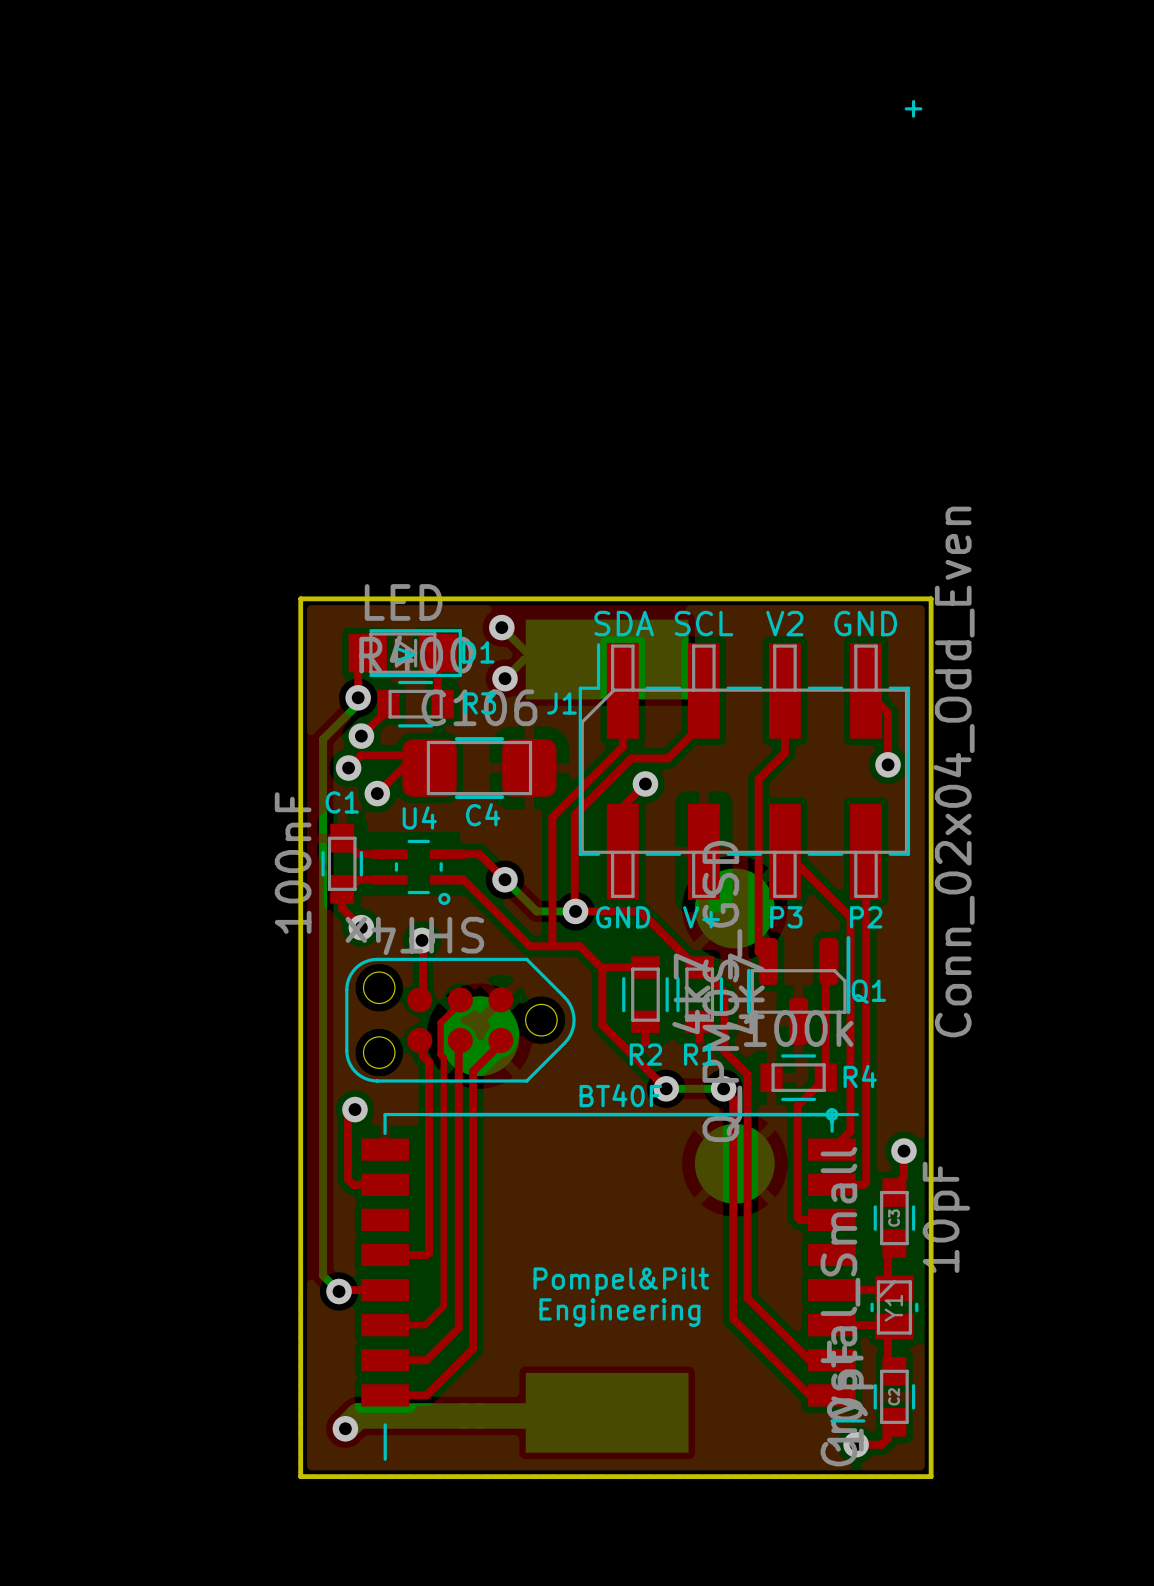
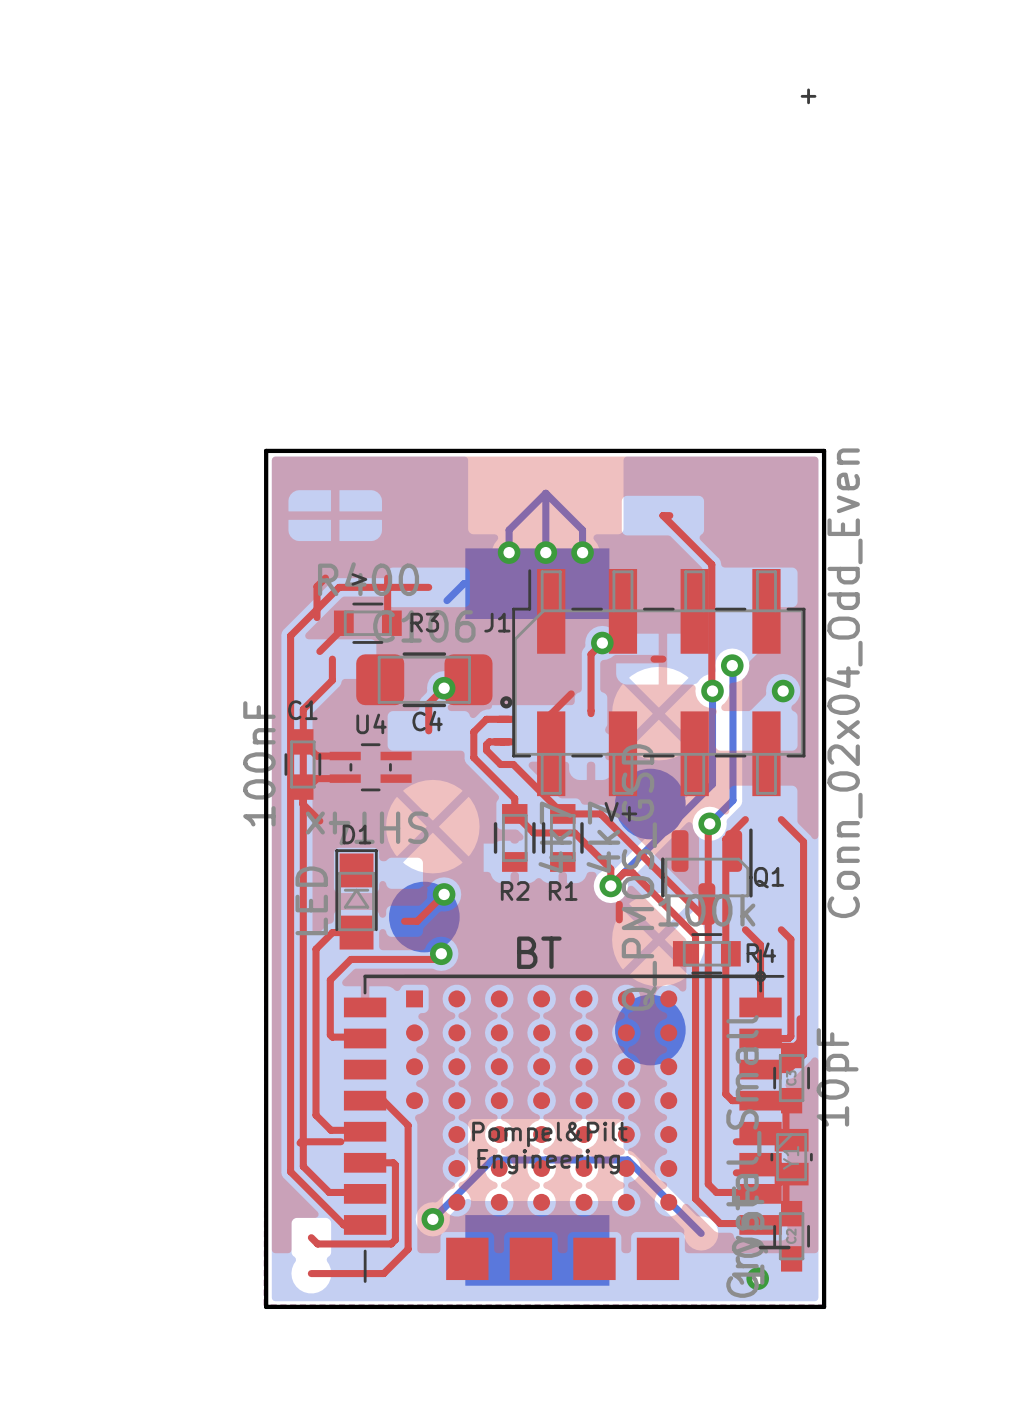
bottom track: none -> (545, 493) (509, 530) (509, 552)
bottom track: none -> (545, 493) (545, 552)
bottom track: none -> (545, 493) (582, 530) (582, 552)
top track: none -> (669, 515) (662, 515) (711, 564) (712, 691)
board edge: (300, 598) (931, 598) -> (266, 530) (266, 450) (824, 450) (824, 530)
text: SDA (624, 623) -> none
text: SCL (703, 623) -> none
text: V2 (784, 623) -> none
text: GND (865, 623) -> none
via: none -> (509, 552)
via: none -> (545, 552)
via: none -> (582, 552)
bottom track: (501, 627) (533, 659) -> none
via: (501, 627) -> none
D1 rotation: 0° (405, 653) -> 90° counterclockwise (356, 899)
D1 position: (405, 653) -> (356, 899)
top track: none -> (428, 587) (339, 587) (290, 635) (290, 1171) (343, 1224) (362, 1224) (360, 1223)
via: (505, 678) -> none
top track: (622, 690) (622, 746) (552, 817) (552, 946) -> none
top track: (703, 690) (703, 722) (668, 758) (631, 758) (574, 815) (574, 910) (640, 911) (696, 967) (699, 967) (724, 992) (724, 1051) (747, 1074) (747, 1298) (809, 1360) (841, 1360) -> none
top track: (784, 690) (784, 753) (758, 779) (758, 951) (768, 961) -> none
top track: (866, 690) (888, 712) (888, 764) -> none
bottom track: (358, 697) (358, 704) (323, 739) (323, 1275) (339, 1291) -> none
via: (358, 697) -> none
top track: none -> (602, 643) (591, 654) (591, 713)
via: (361, 736) -> none
top track: none -> (332, 659) (332, 680) (303, 709) (303, 1166) (329, 1192) (349, 1192)
top track: none -> (654, 659) (662, 659)
bottom track: none -> (732, 665) (732, 800) (709, 823)
via: none -> (732, 665)
via position: (888, 764) -> (783, 691)
top track: (348, 768) (361, 755) (416, 755) (429, 768) (402, 768) (377, 793) -> none
via: (348, 768) -> none
top track: none -> (444, 688) (428, 703) (428, 730)
via: none -> (444, 688)
bottom track: none -> (712, 691) (712, 784) (610, 885)
via: none -> (712, 691)
via position: (645, 783) -> (602, 643)
drawing: none -> [500, 696, 513, 709]
via: (377, 793) -> none
top track: none -> (511, 719) (486, 719) (473, 731) (473, 757) (514, 798) (514, 813) (533, 832) (574, 832) (610, 869) (610, 885) (624, 872) (632, 872) (695, 935) (695, 1198) (720, 1223) (744, 1223)
top track: none -> (511, 741) (489, 741) (486, 744) (486, 750) (500, 764) (513, 764) (562, 813) (600, 813) (708, 921)
top track: (784, 851) (850, 917) (850, 1131) (831, 1149) -> none
top track: (866, 851) (866, 1182) (863, 1184) (831, 1184) -> none
top track: (447, 854) (479, 854) (505, 879) -> none
top track: (447, 879) (463, 879) (530, 946) (580, 946) (601, 967) (645, 967) -> none
bottom track: (505, 879) (536, 911) (575, 911) -> none
via: (505, 879) -> none
drawing: [438, 892, 451, 906] -> none
via: (575, 911) -> none
text: GND (623, 917) -> none
text: P3 (786, 917) -> none
text: P2 (866, 917) -> none
top track: none -> (745, 819) (725, 839) (725, 1094) (732, 1100) (760, 1100)
top track: none -> (781, 819) (803, 841) (803, 1054) (788, 1069) (760, 1069)
via: (361, 927) -> none
top track: none -> (709, 823) (708, 1184) (716, 1192) (744, 1192)
via: none -> (709, 823)
top track: (422, 940) (422, 999) -> none
via: (422, 940) -> none
R2 footprint: [622, 956, 669, 1033] -> [493, 804, 536, 872]
R1 footprint: [676, 956, 724, 1033] -> [541, 804, 584, 872]
top track: (828, 961) (825, 964) (825, 1077) (797, 1105) (797, 1217) (800, 1219) (831, 1219) -> none
top track: (602, 967) (602, 1024) (666, 1088) -> none
top track: (463, 999) (440, 1022) (440, 1054) (443, 1057) (443, 1306) (425, 1325) (394, 1325) -> none
via: none -> (610, 885)
top track: none -> (444, 894) (417, 921) (404, 921)
via: none -> (444, 894)
part: (460, 1020) -> none
top track: (645, 1021) (645, 1042) -> none
top track: (422, 1040) (422, 1056) (428, 1062) (428, 1252) (426, 1254) (394, 1254) -> none
top track: (463, 1040) (458, 1045) (458, 1328) (426, 1360) (394, 1360) -> none
top track: (504, 1040) (473, 1071) (473, 1348) (426, 1395) (394, 1395) -> none
top track: none -> (745, 929) (760, 944) (760, 1007)
top track: none -> (781, 929) (790, 939) (790, 1036) (788, 1038) (760, 1038)
top track: none -> (356, 932) (332, 932) (316, 949) (316, 1115) (331, 1130) (349, 1130)
top track: none -> (441, 953) (435, 959) (350, 959) (330, 980) (330, 1035) (332, 1037) (360, 1037)
via: none -> (441, 953)
bottom track: (666, 1088) (723, 1088) -> none
via: (666, 1088) -> none
top track: (723, 1088) (733, 1098) (733, 1319) (809, 1395) (841, 1395) -> none
via: (723, 1088) -> none
top track: (354, 1109) (348, 1116) (348, 1179) (353, 1184) (385, 1184) -> none
via: (354, 1109) -> none
via: (903, 1151) -> none
top track: none -> (365, 1100) (383, 1100) (408, 1125) (408, 1249) (383, 1273) (311, 1273)
part: none -> BT (567, 1116)
part: BT40F (613, 1284) -> none
via: (339, 1291) -> none
top track: none -> (365, 1162) (393, 1162) (395, 1164) (395, 1239) (391, 1243) (317, 1243) (311, 1237)
bottom track: none -> (432, 1219) (492, 1160) (627, 1160) (701, 1233)
via: none -> (432, 1219)
bottom track: (607, 1415) (358, 1415) (345, 1428) -> none
top track: (888, 1422) (888, 1438) (881, 1444) (856, 1444) -> none
via: (345, 1428) -> none

